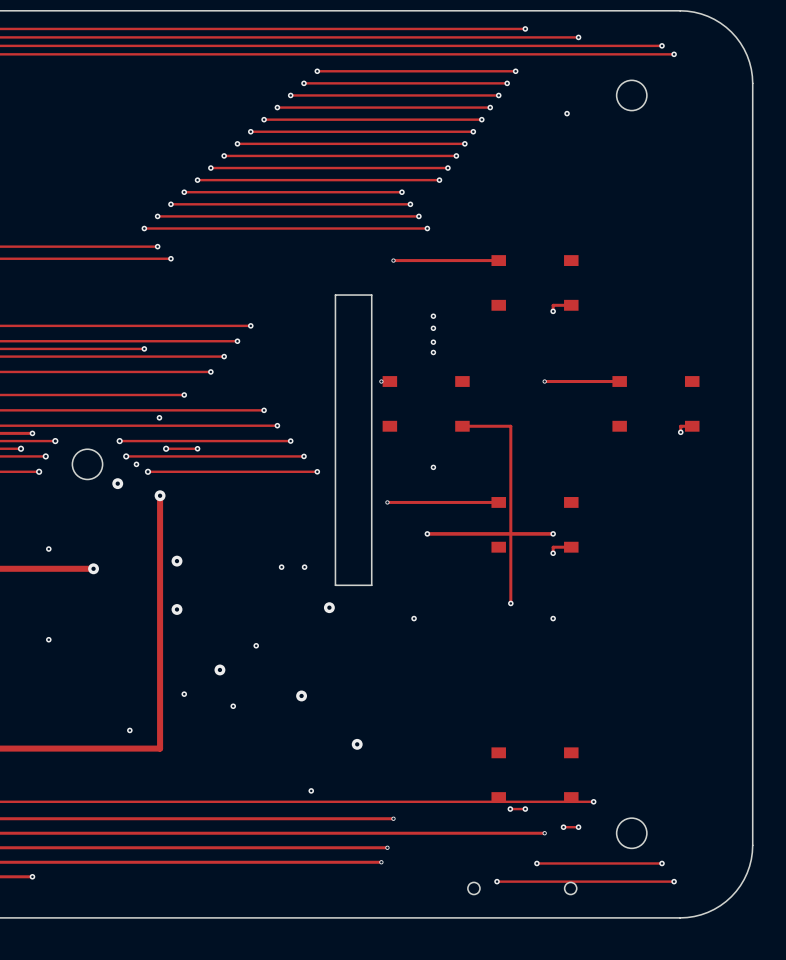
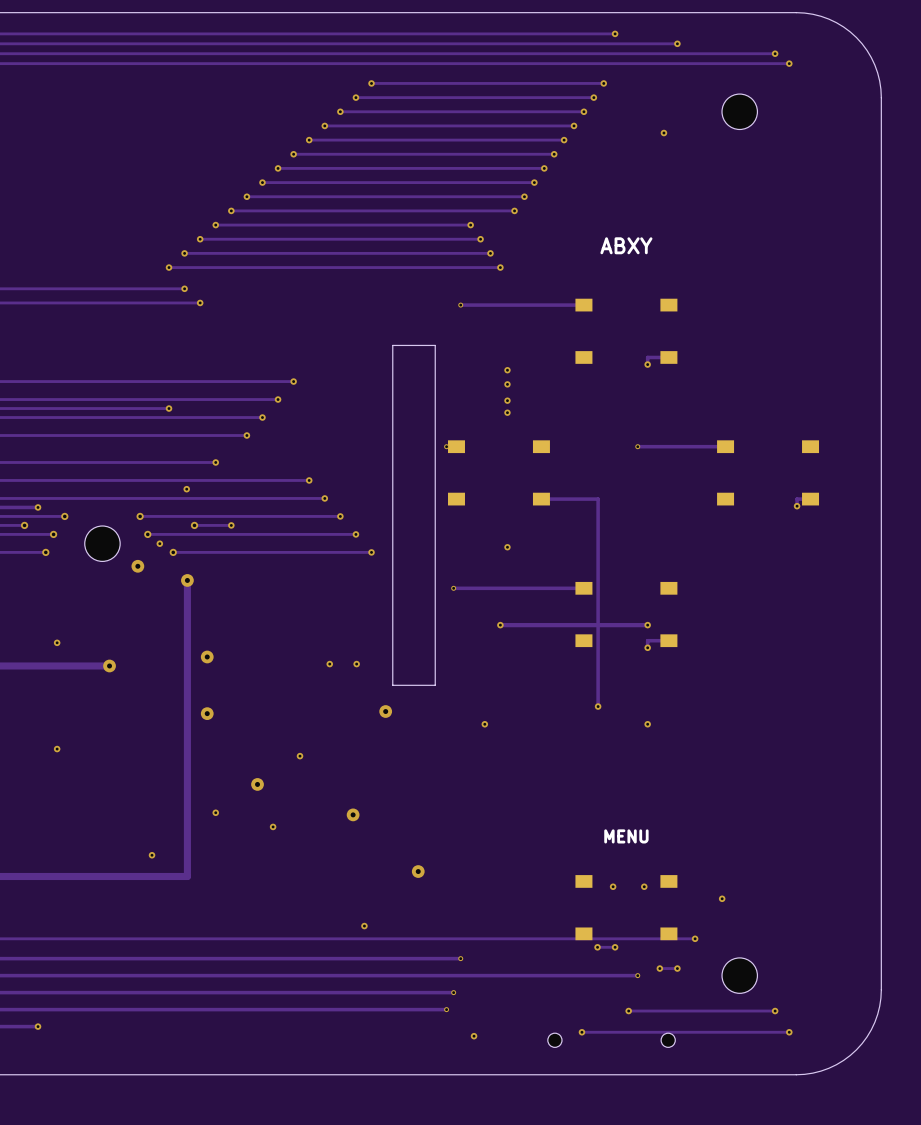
text: none -> ABXY (626, 245)
text: none -> MENU (626, 836)
via: none -> (613, 886)
via: none -> (644, 886)
via: none -> (722, 898)
via: none -> (474, 1036)

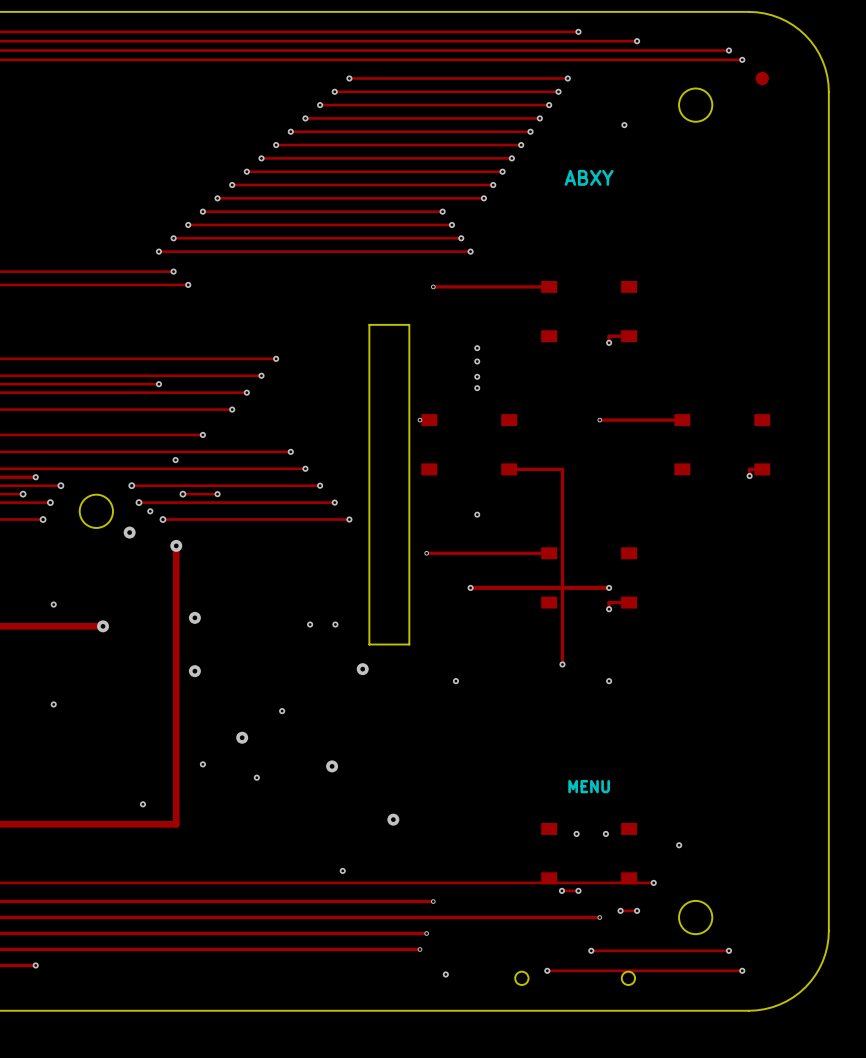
part: none -> (762, 78)
text position: ABXY (626, 245) -> ABXY (589, 177)

